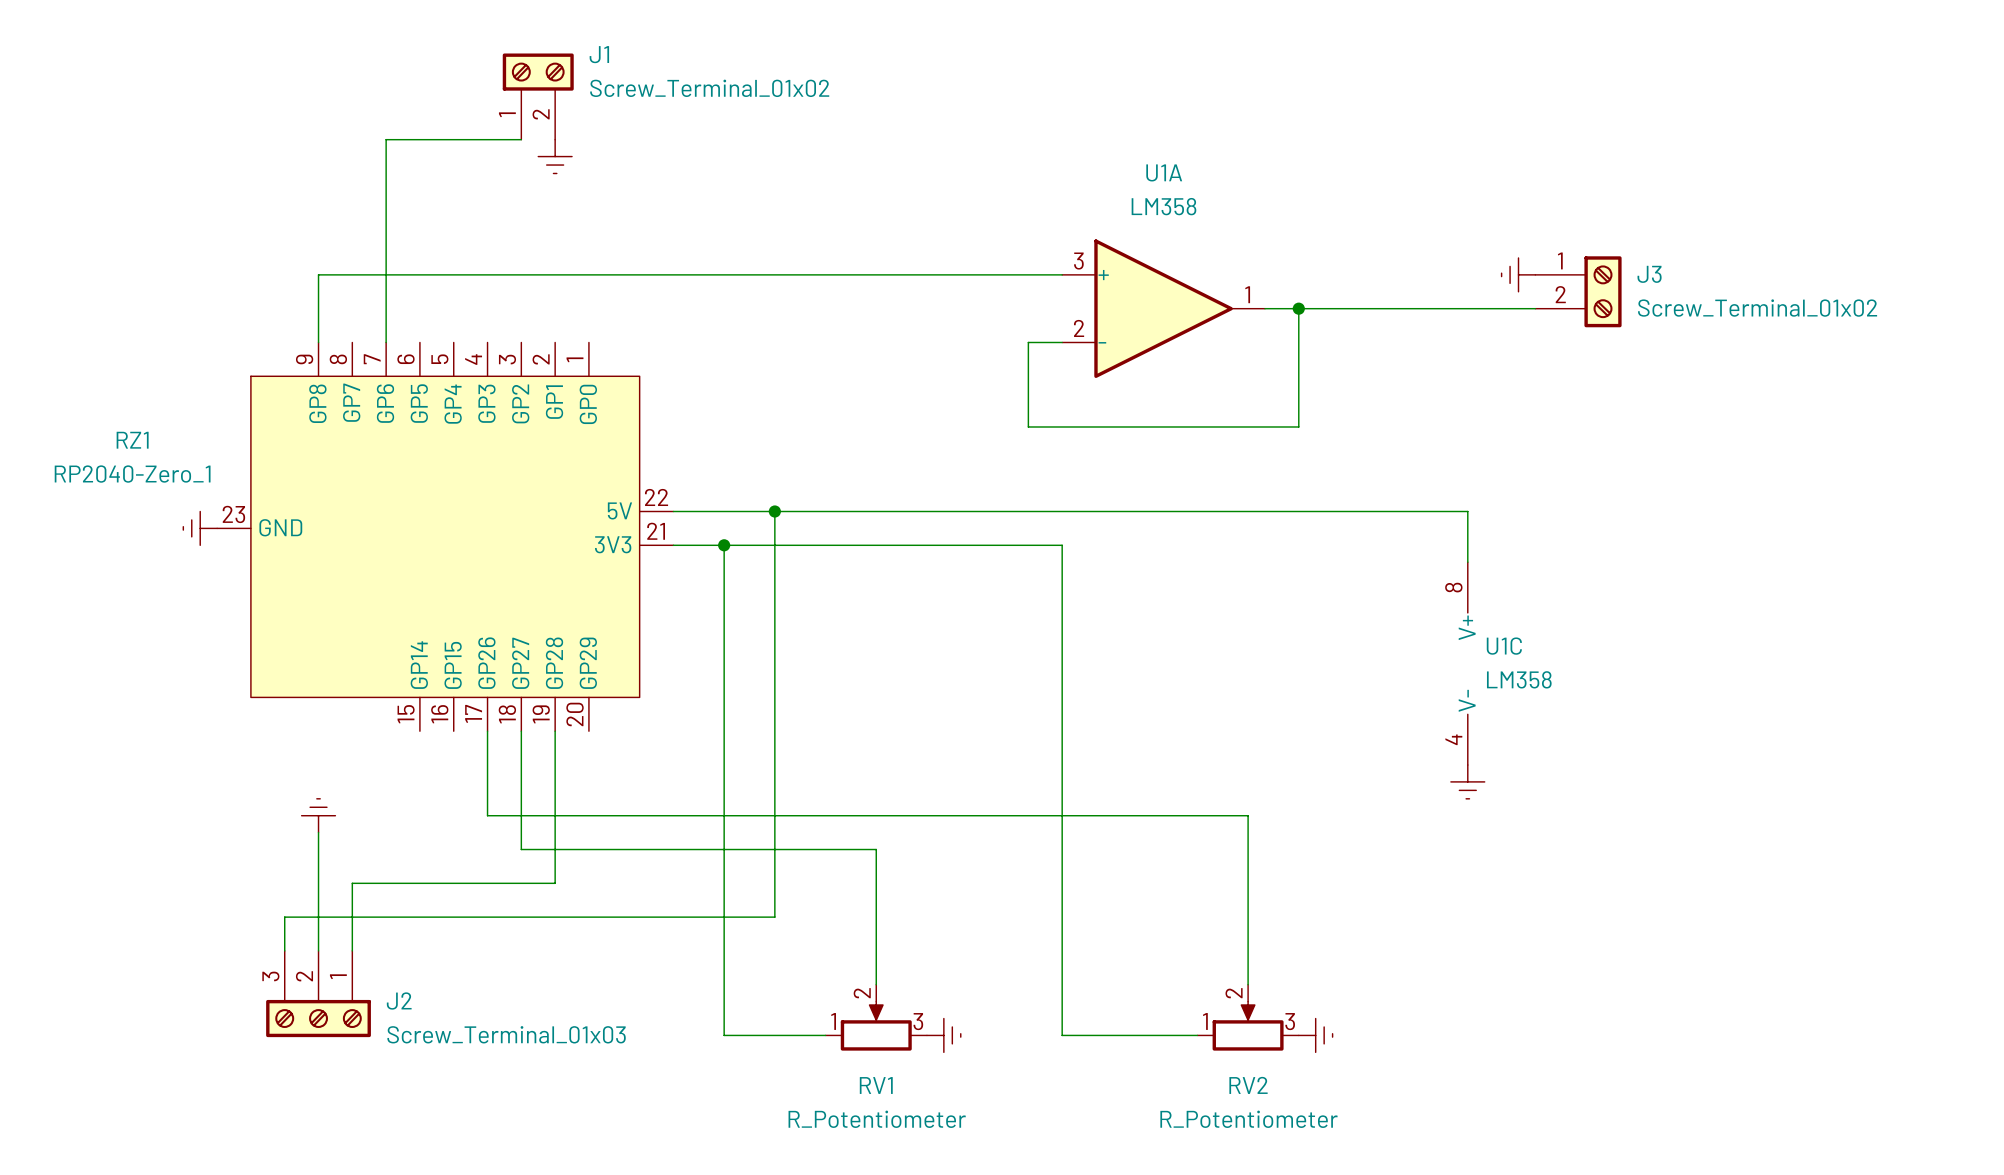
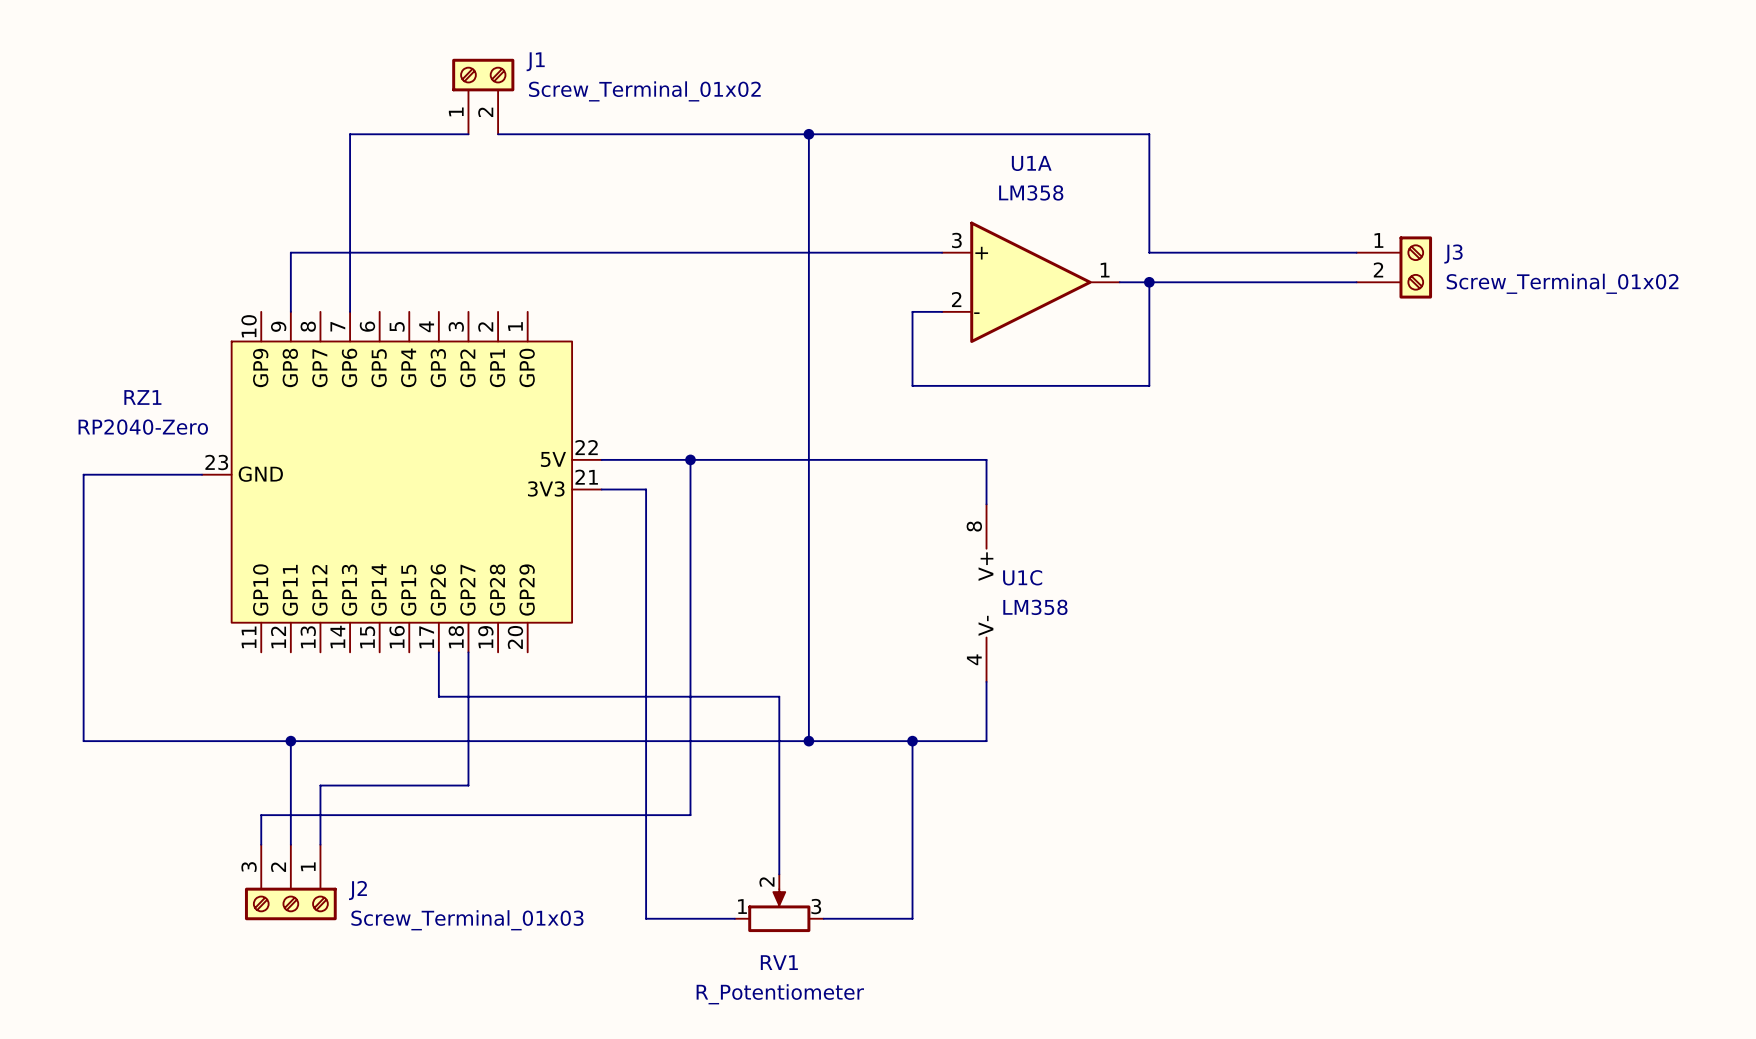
wire: none -> (498, 134) (1149, 134) (1149, 252) (1356, 252)
wire: none -> (808, 134) (808, 741)
junction: none -> (808, 134)
power symbol: (555, 156) -> none
power symbol: (1518, 274) -> none
RZ1 symbol: [217, 342, 674, 732] -> [202, 311, 602, 653]
RZ1 value: RP2040-Zero_1 (132, 474) -> RP2040-Zero (143, 427)
wire: (1112, 511) (1467, 511) (1467, 562) -> (986, 459) (986, 504)
power symbol: (200, 528) -> none
wire: none -> (202, 474) (83, 474) (83, 741) (986, 741) (986, 681)
wire: (724, 545) (1062, 545) (1062, 1035) (1197, 1035) -> none
junction: (724, 545) -> none
U1C position: (1467, 663) -> (986, 593)
wire: (555, 731) (555, 883) (521, 883) -> (468, 755) (468, 785)
wire: (487, 781) (487, 815) (1248, 815) (1248, 984) -> none
power symbol: (1467, 781) -> none
power symbol: (318, 815) -> none
junction: none -> (290, 741)
junction: none -> (808, 741)
wire: none -> (912, 741) (912, 918) (823, 918)
junction: none -> (912, 741)
wire: (521, 849) (876, 849) -> (438, 696) (779, 696) (779, 755)
RV2: R_Potentiometer (1248, 1017) -> none
power symbol: (943, 1035) -> none
power symbol: (1315, 1035) -> none

